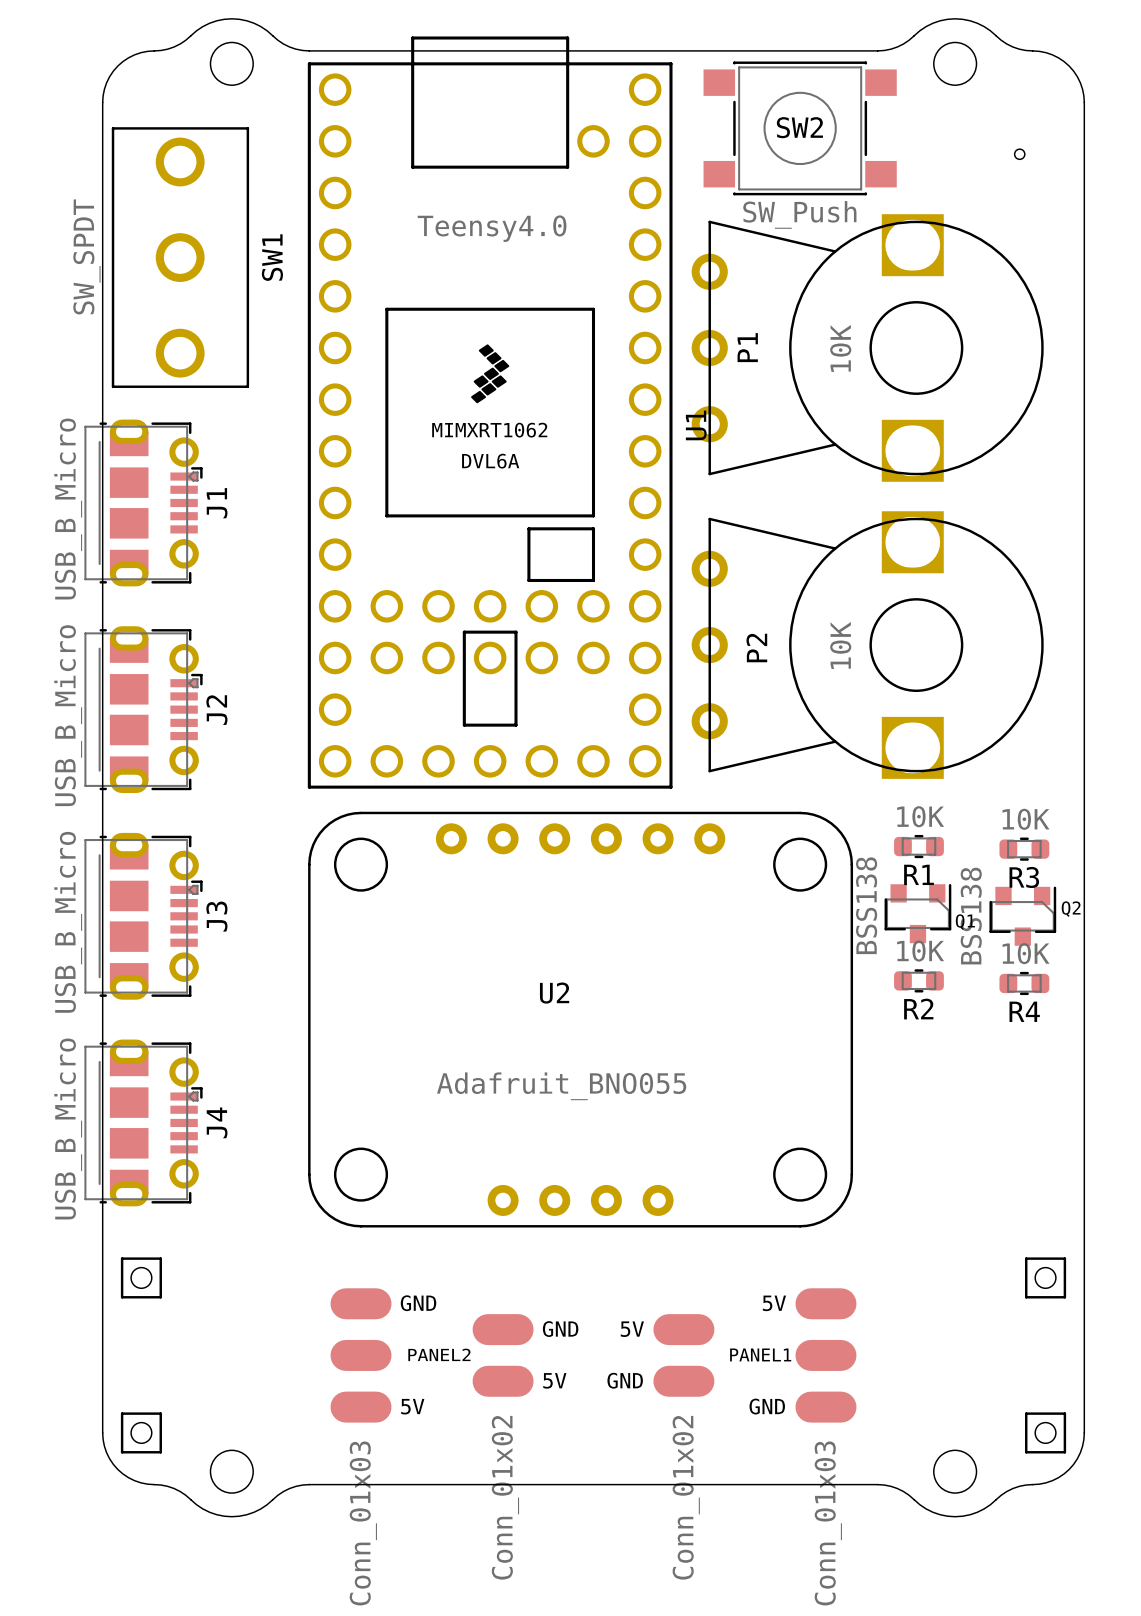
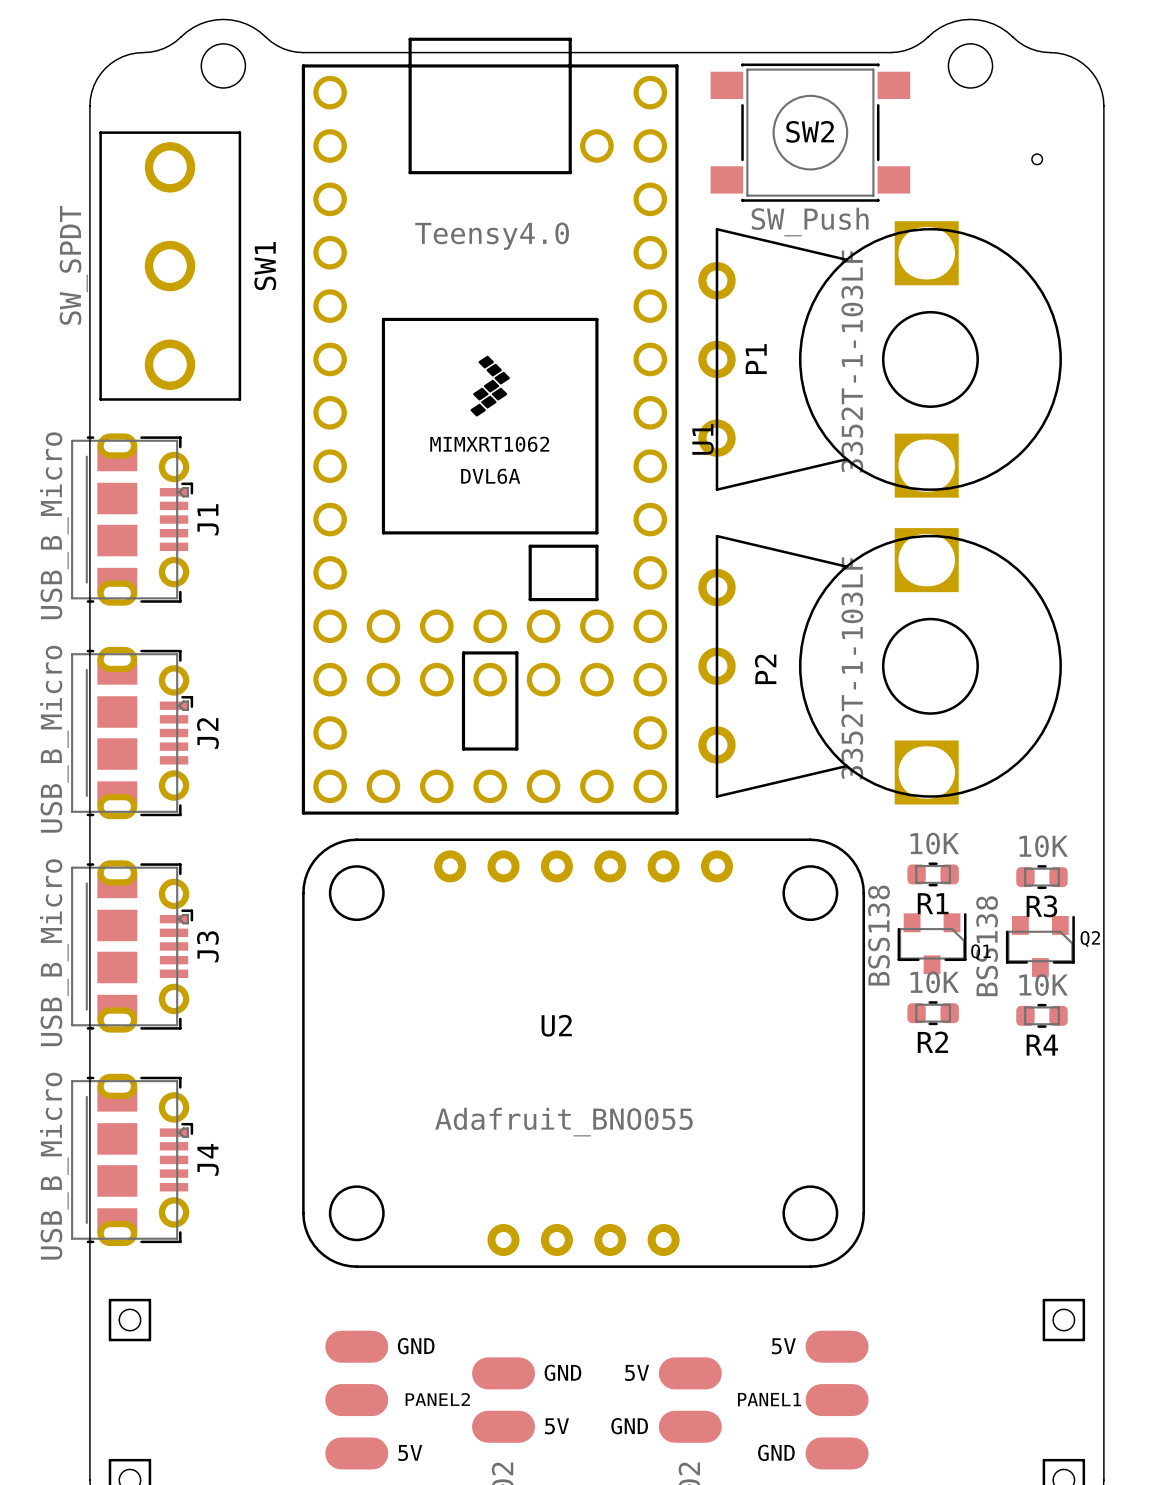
P1 value: 10K (840, 348) -> 3352T-1-103LF (852, 361)
P2 value: 10K (840, 645) -> 3352T-1-103LF (852, 668)

